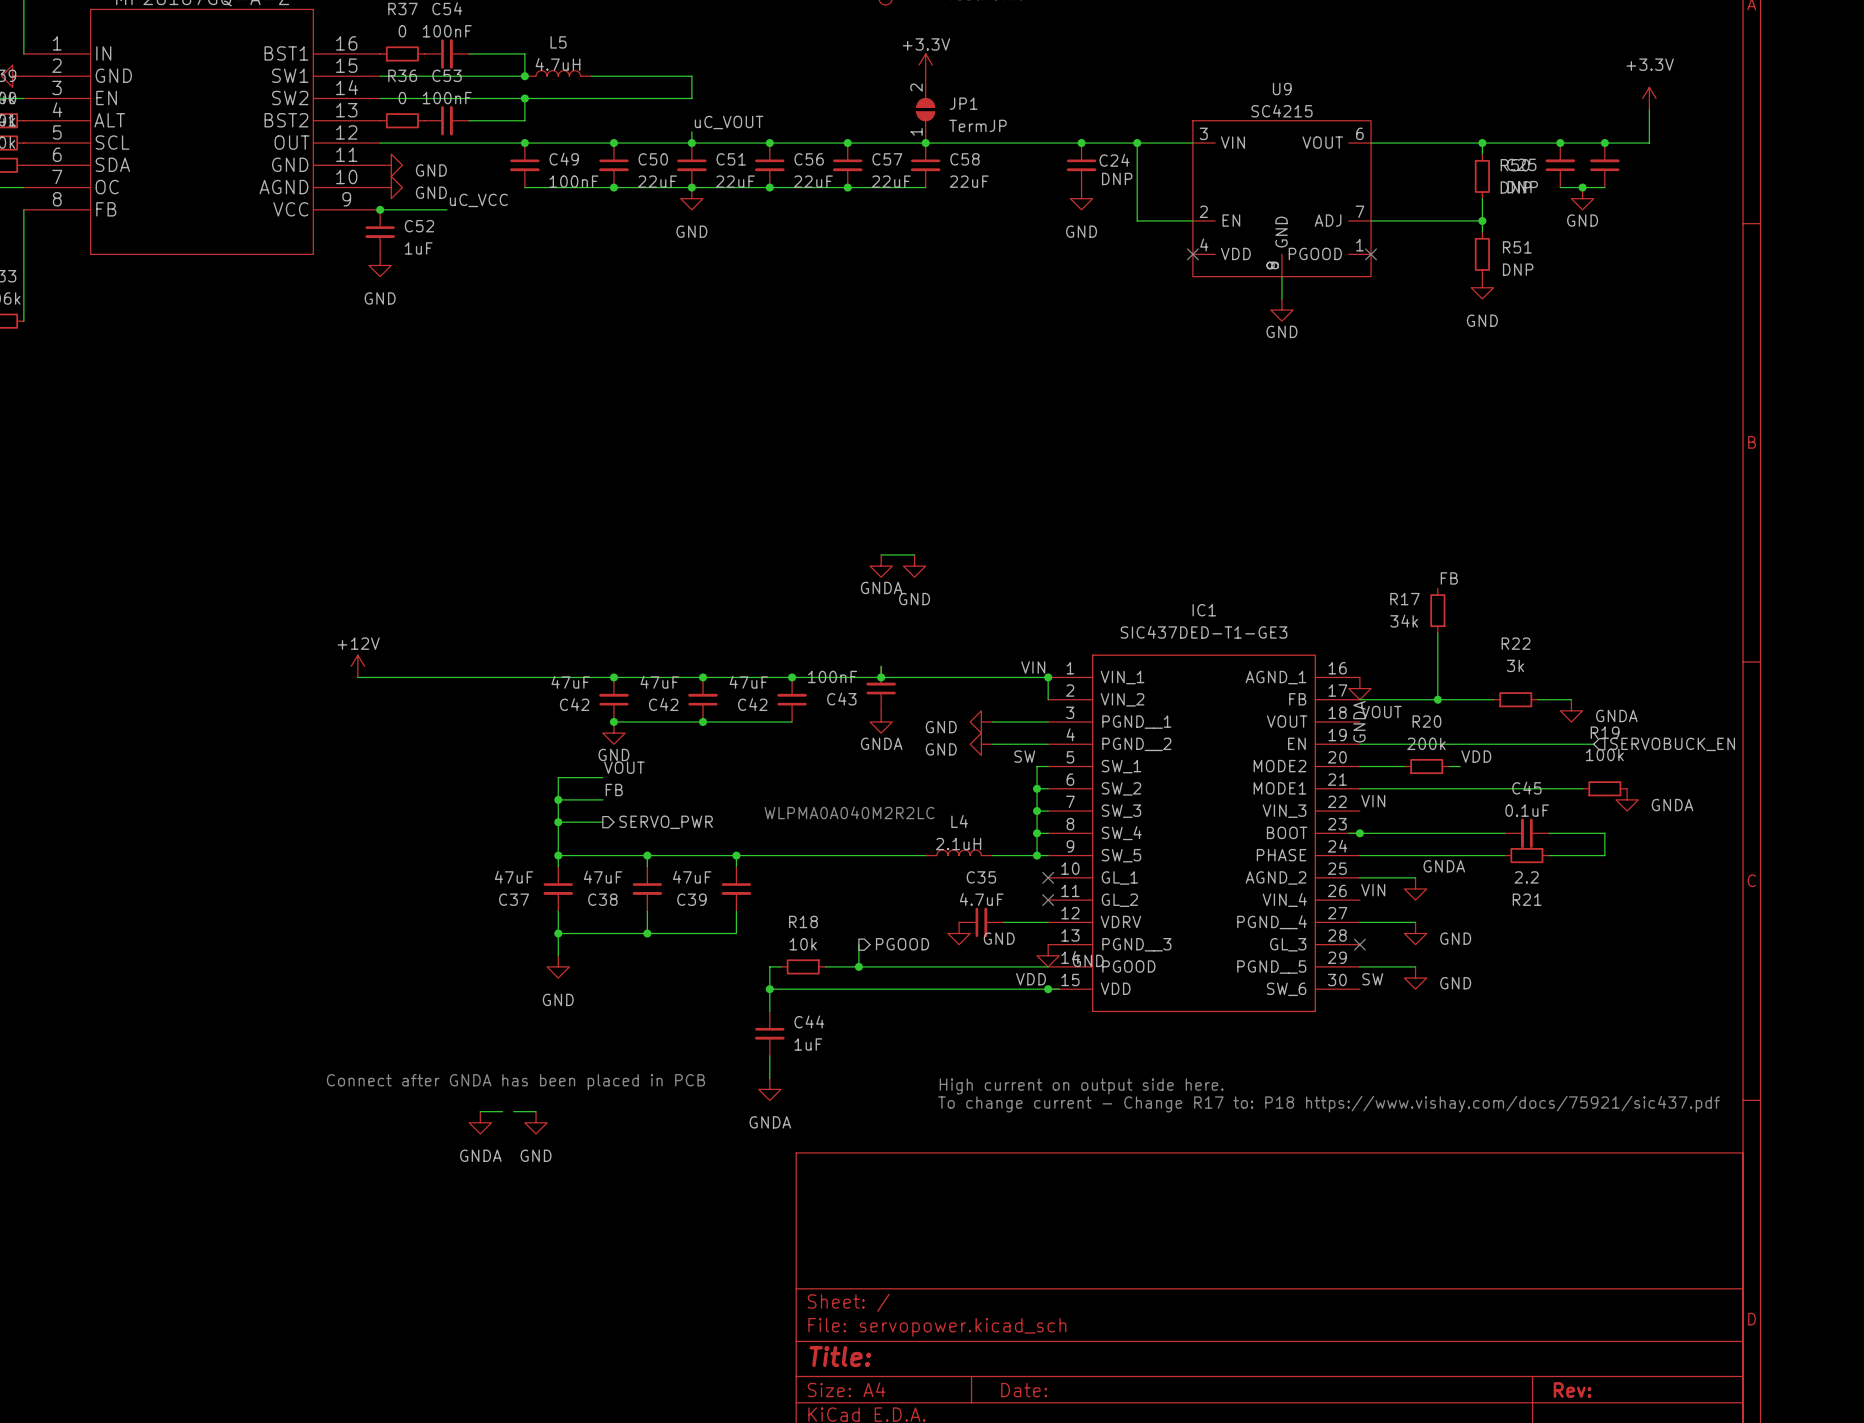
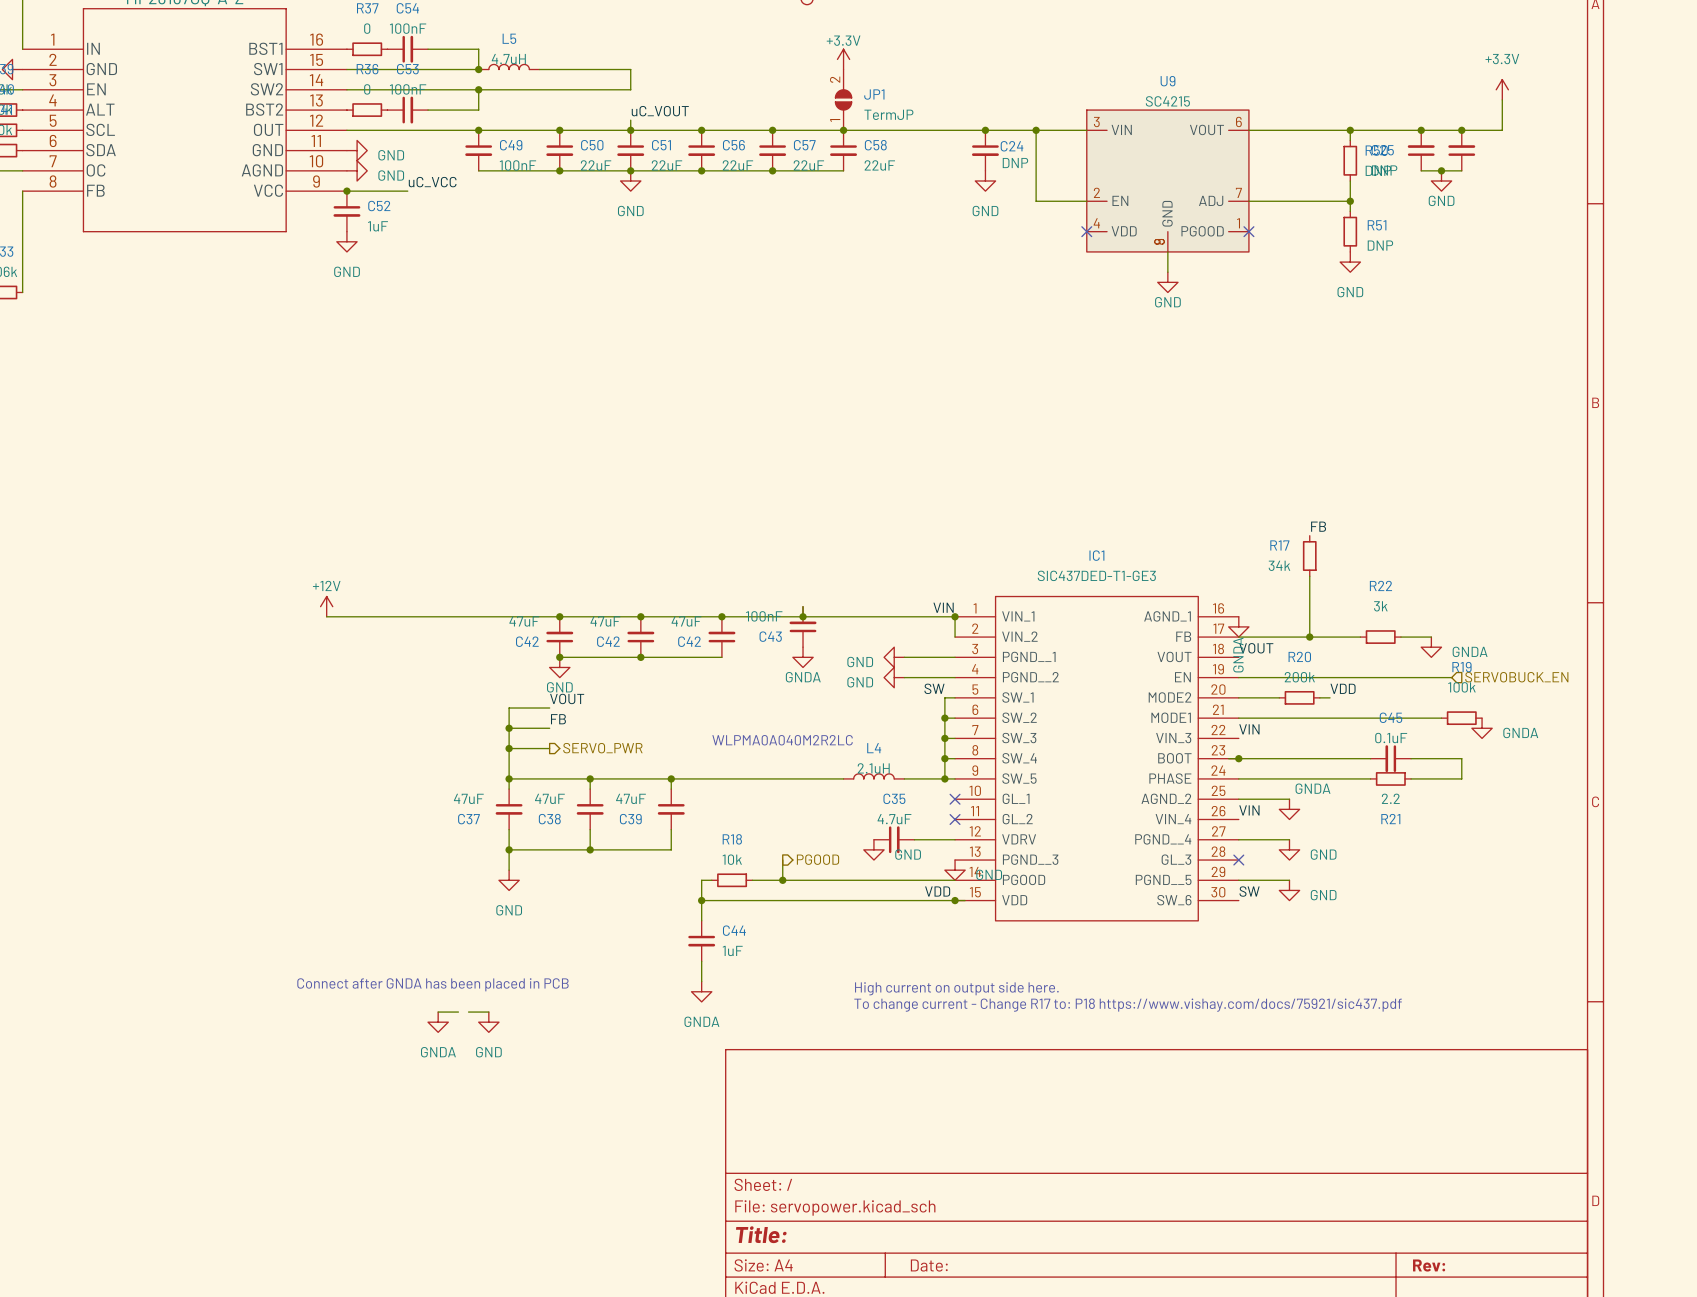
wire: (881, 554) (914, 554) -> none
power symbol: GNDA (881, 566) -> none
power symbol: GND (914, 566) -> none

